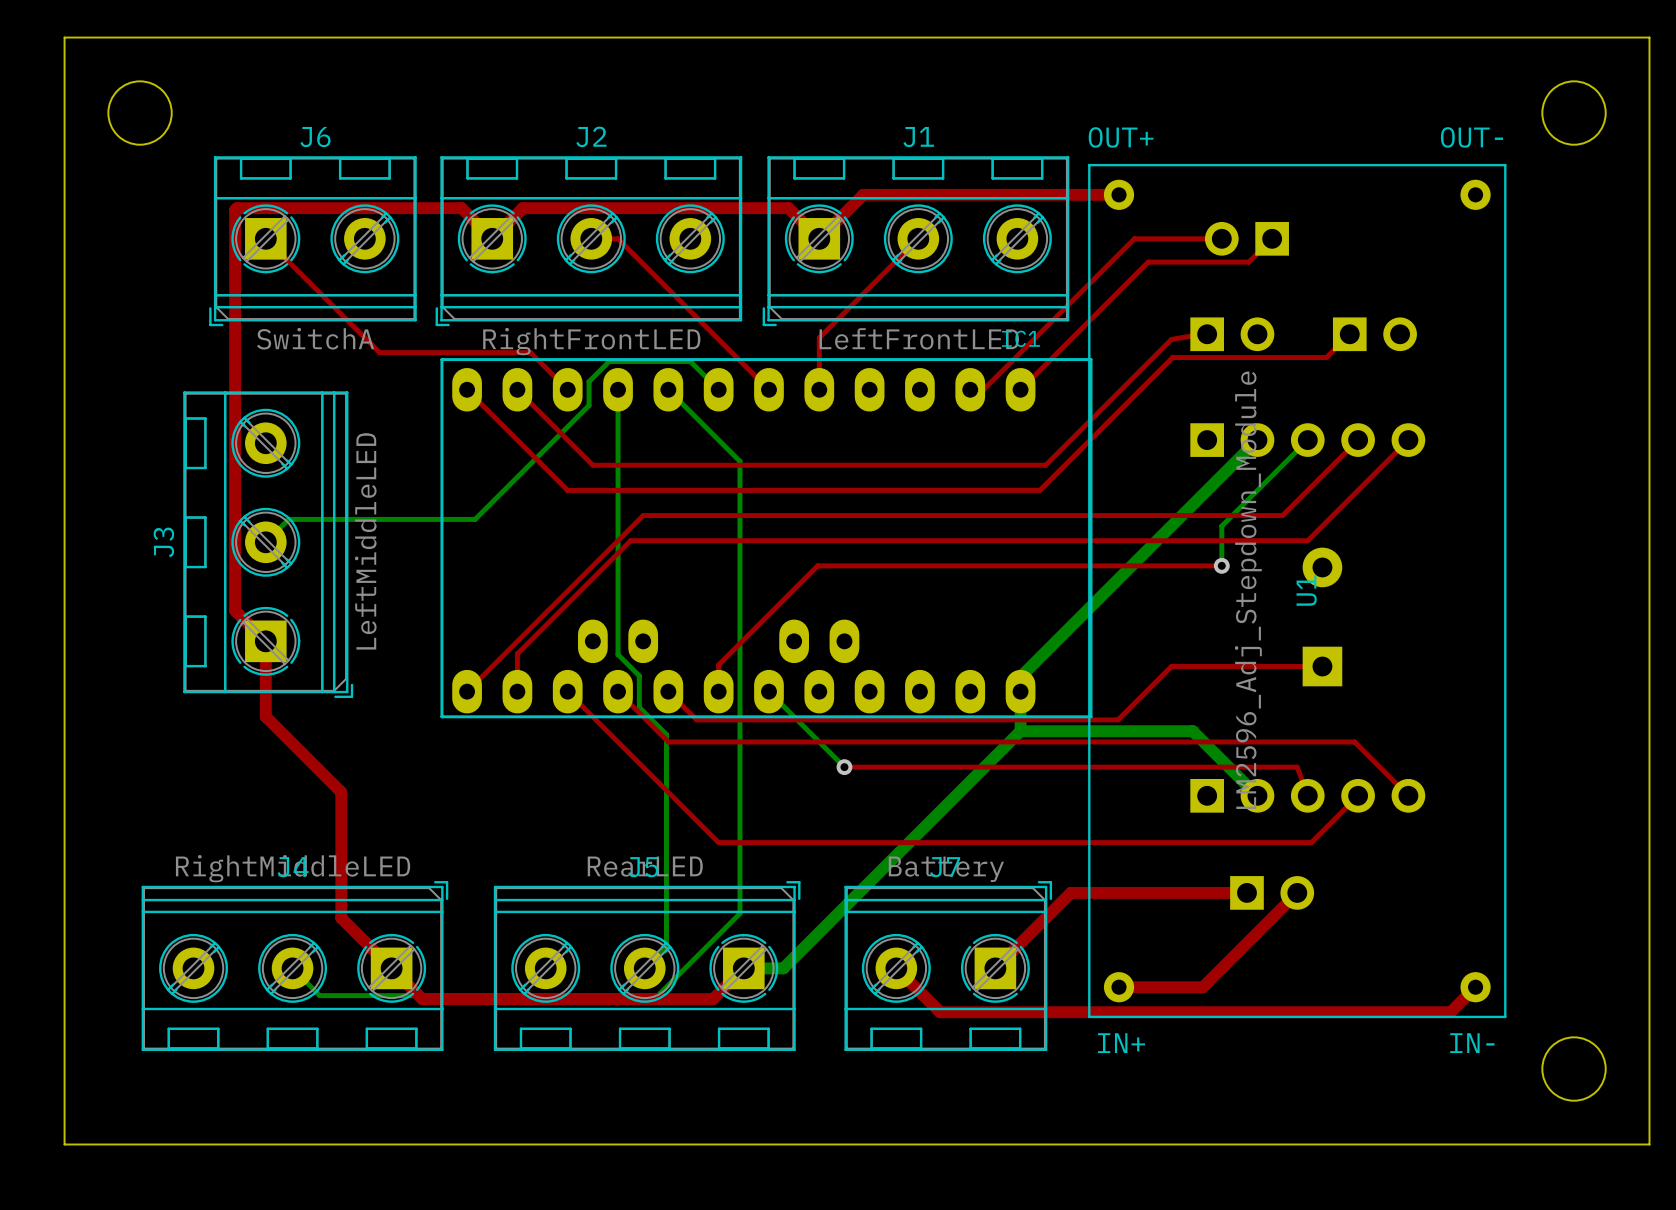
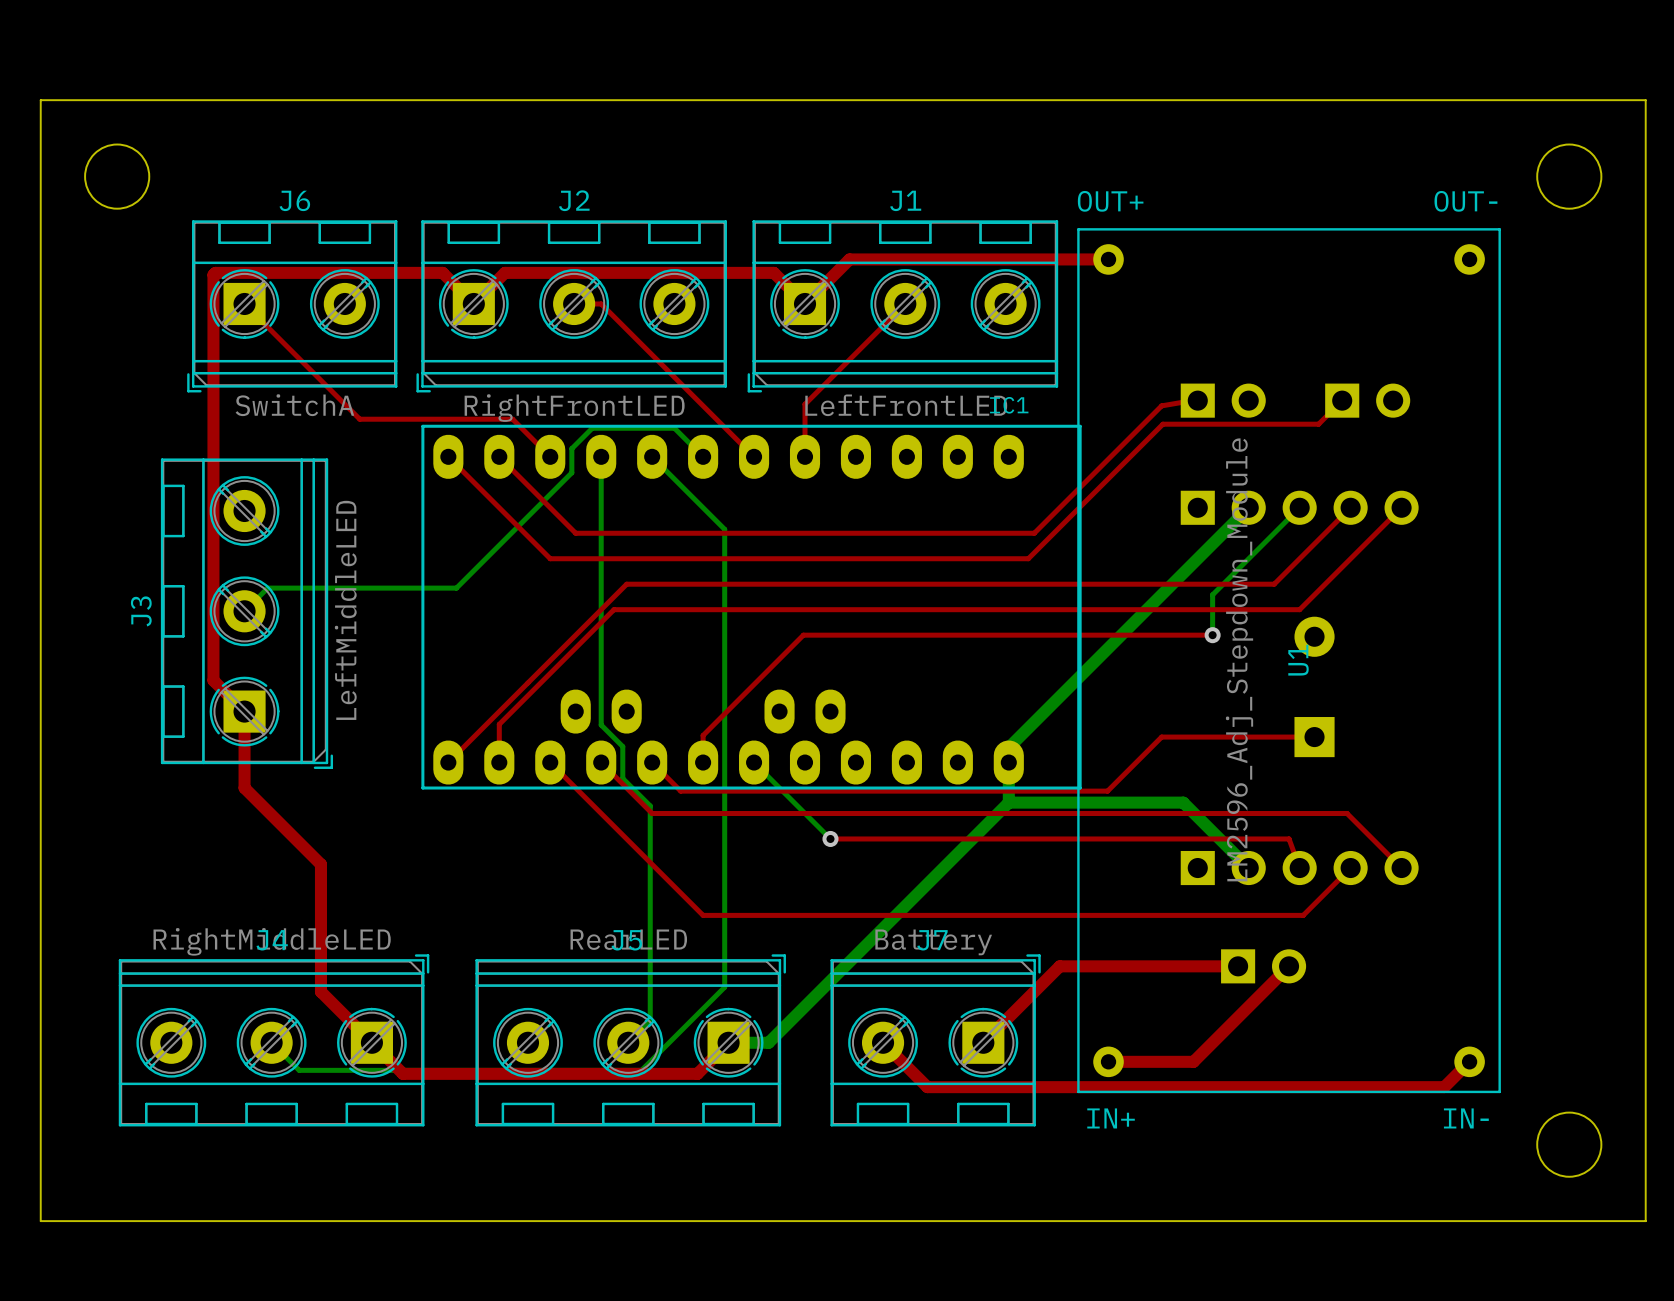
top track: (1221, 238) (1134, 238) (983, 389) (970, 389) -> none
part: (1246, 238) -> none
top track: (1272, 238) (1248, 262) (1148, 262) (1020, 389) -> none

